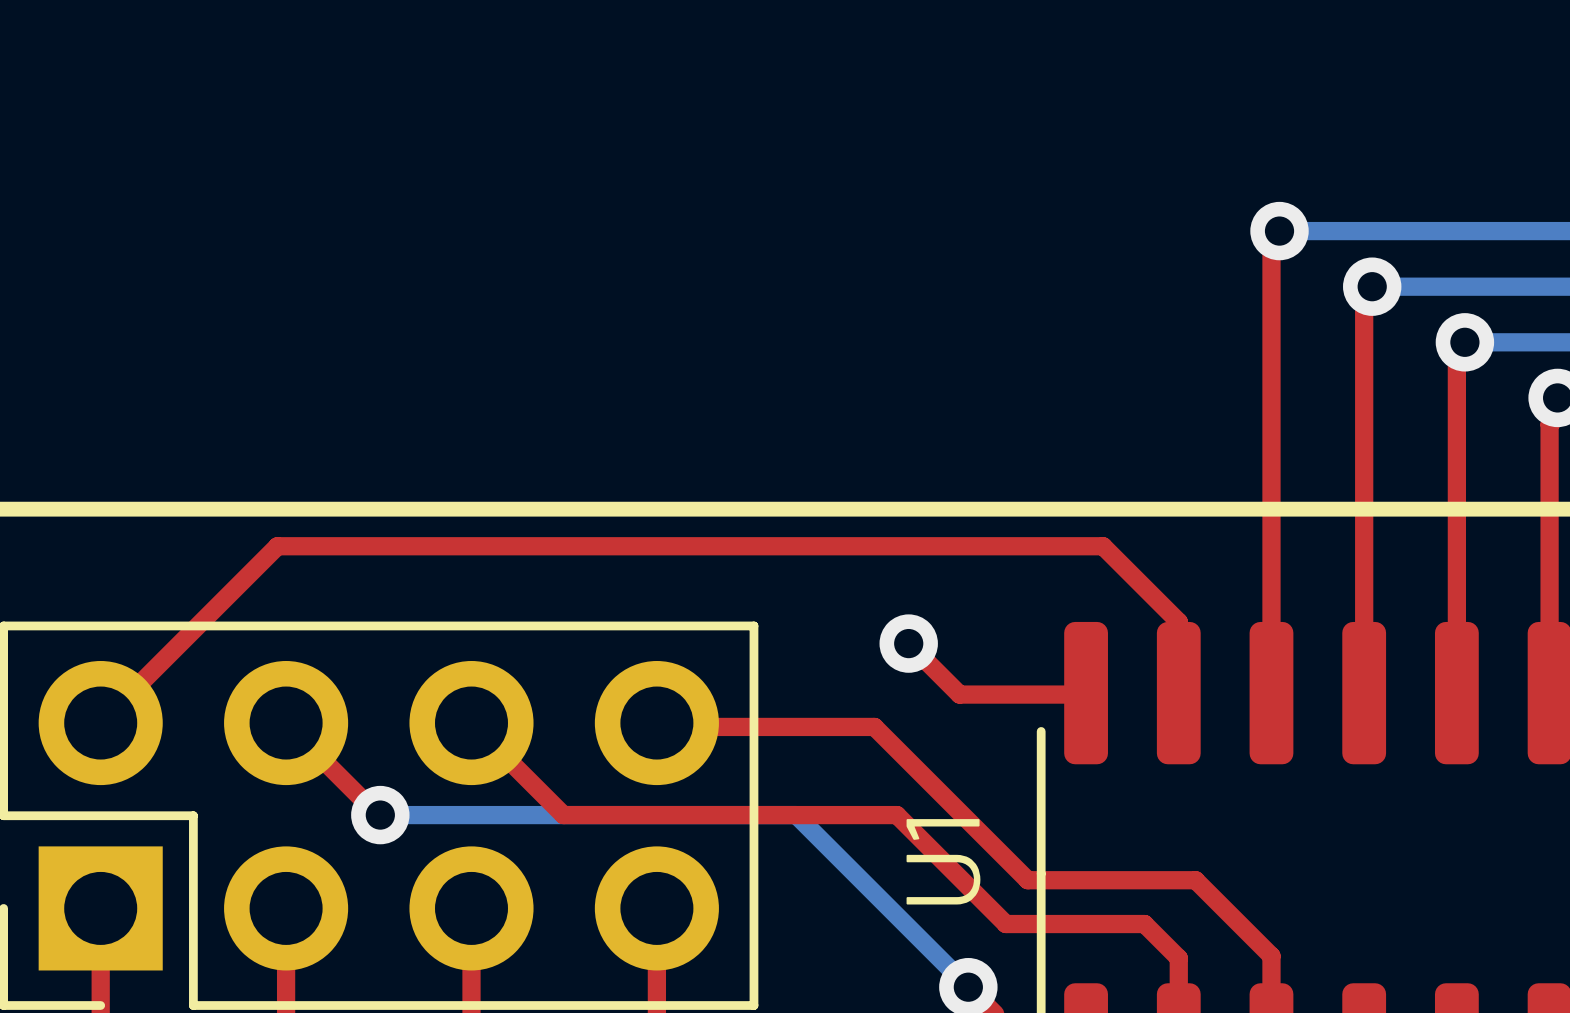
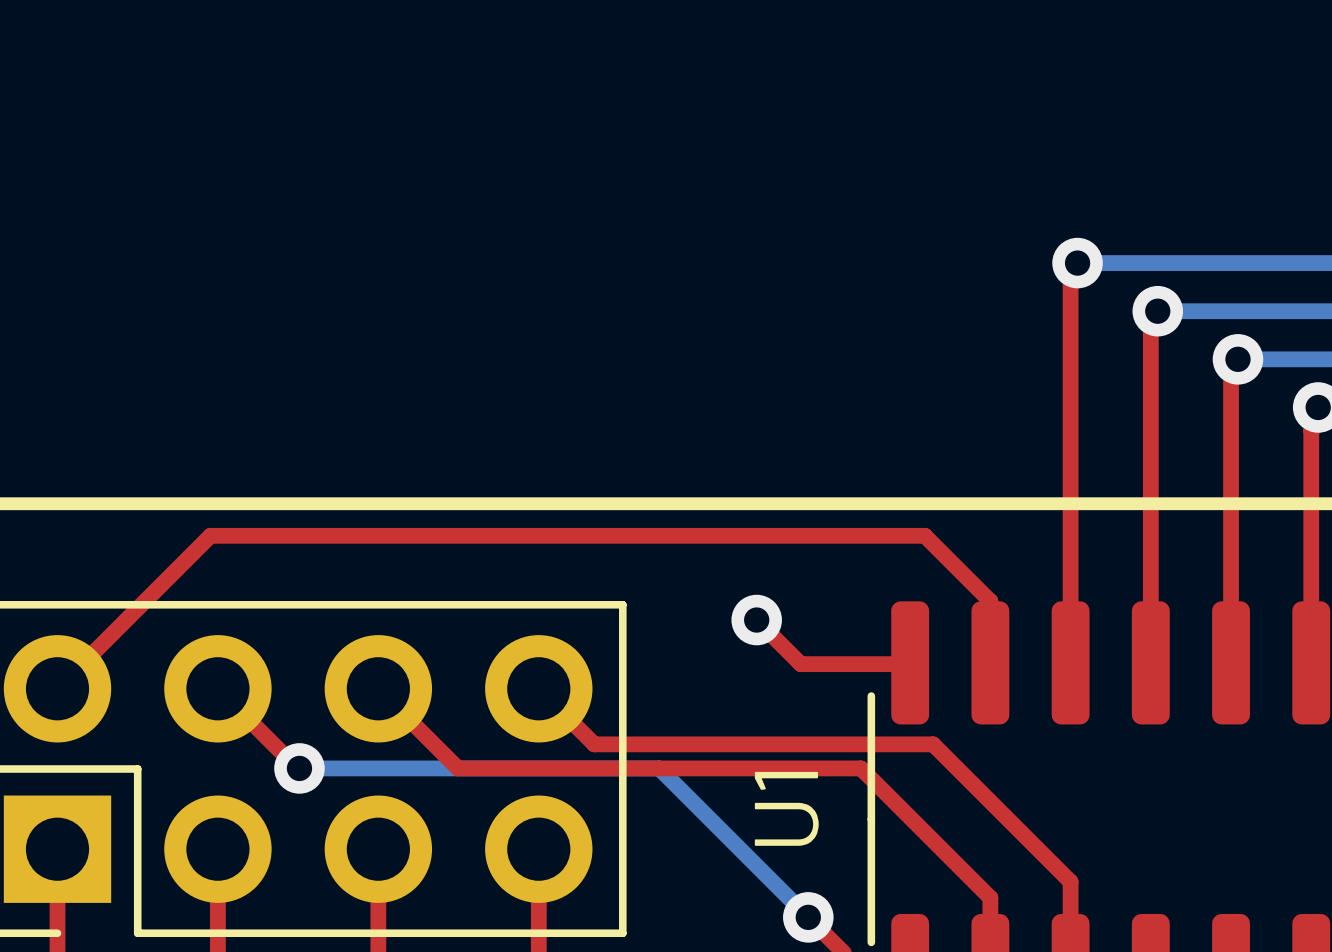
top track: (660, 726) (874, 726) (1027, 880) (1195, 880) (1271, 956) -> (542, 692) (594, 744) (933, 744) (1070, 881) (1070, 890)
top track: (896, 815) (1005, 924) (1144, 924) (1178, 958) (1178, 964) -> (746, 768) (860, 768) (990, 897)

